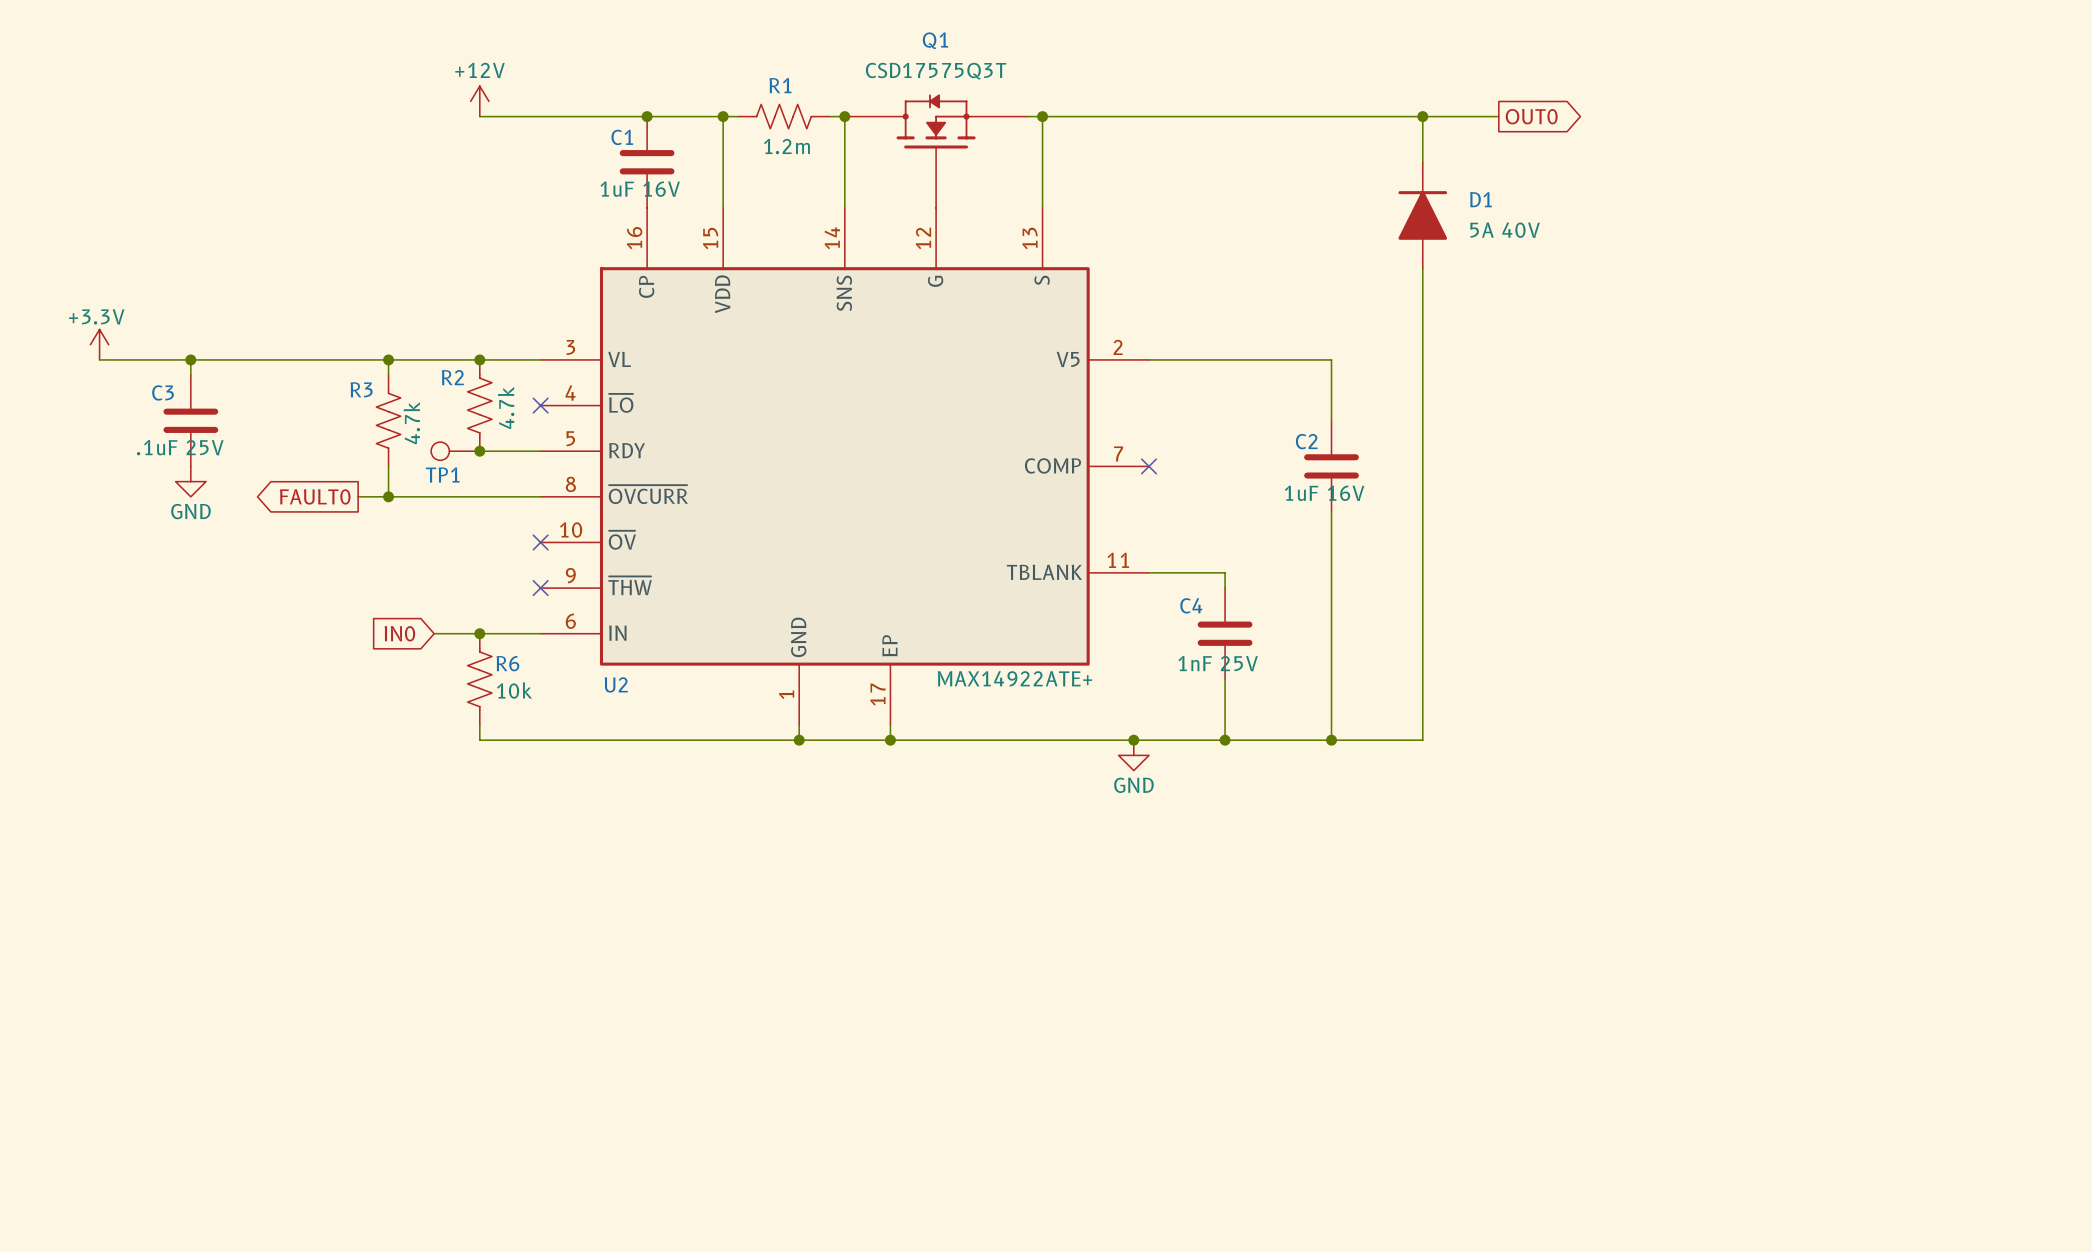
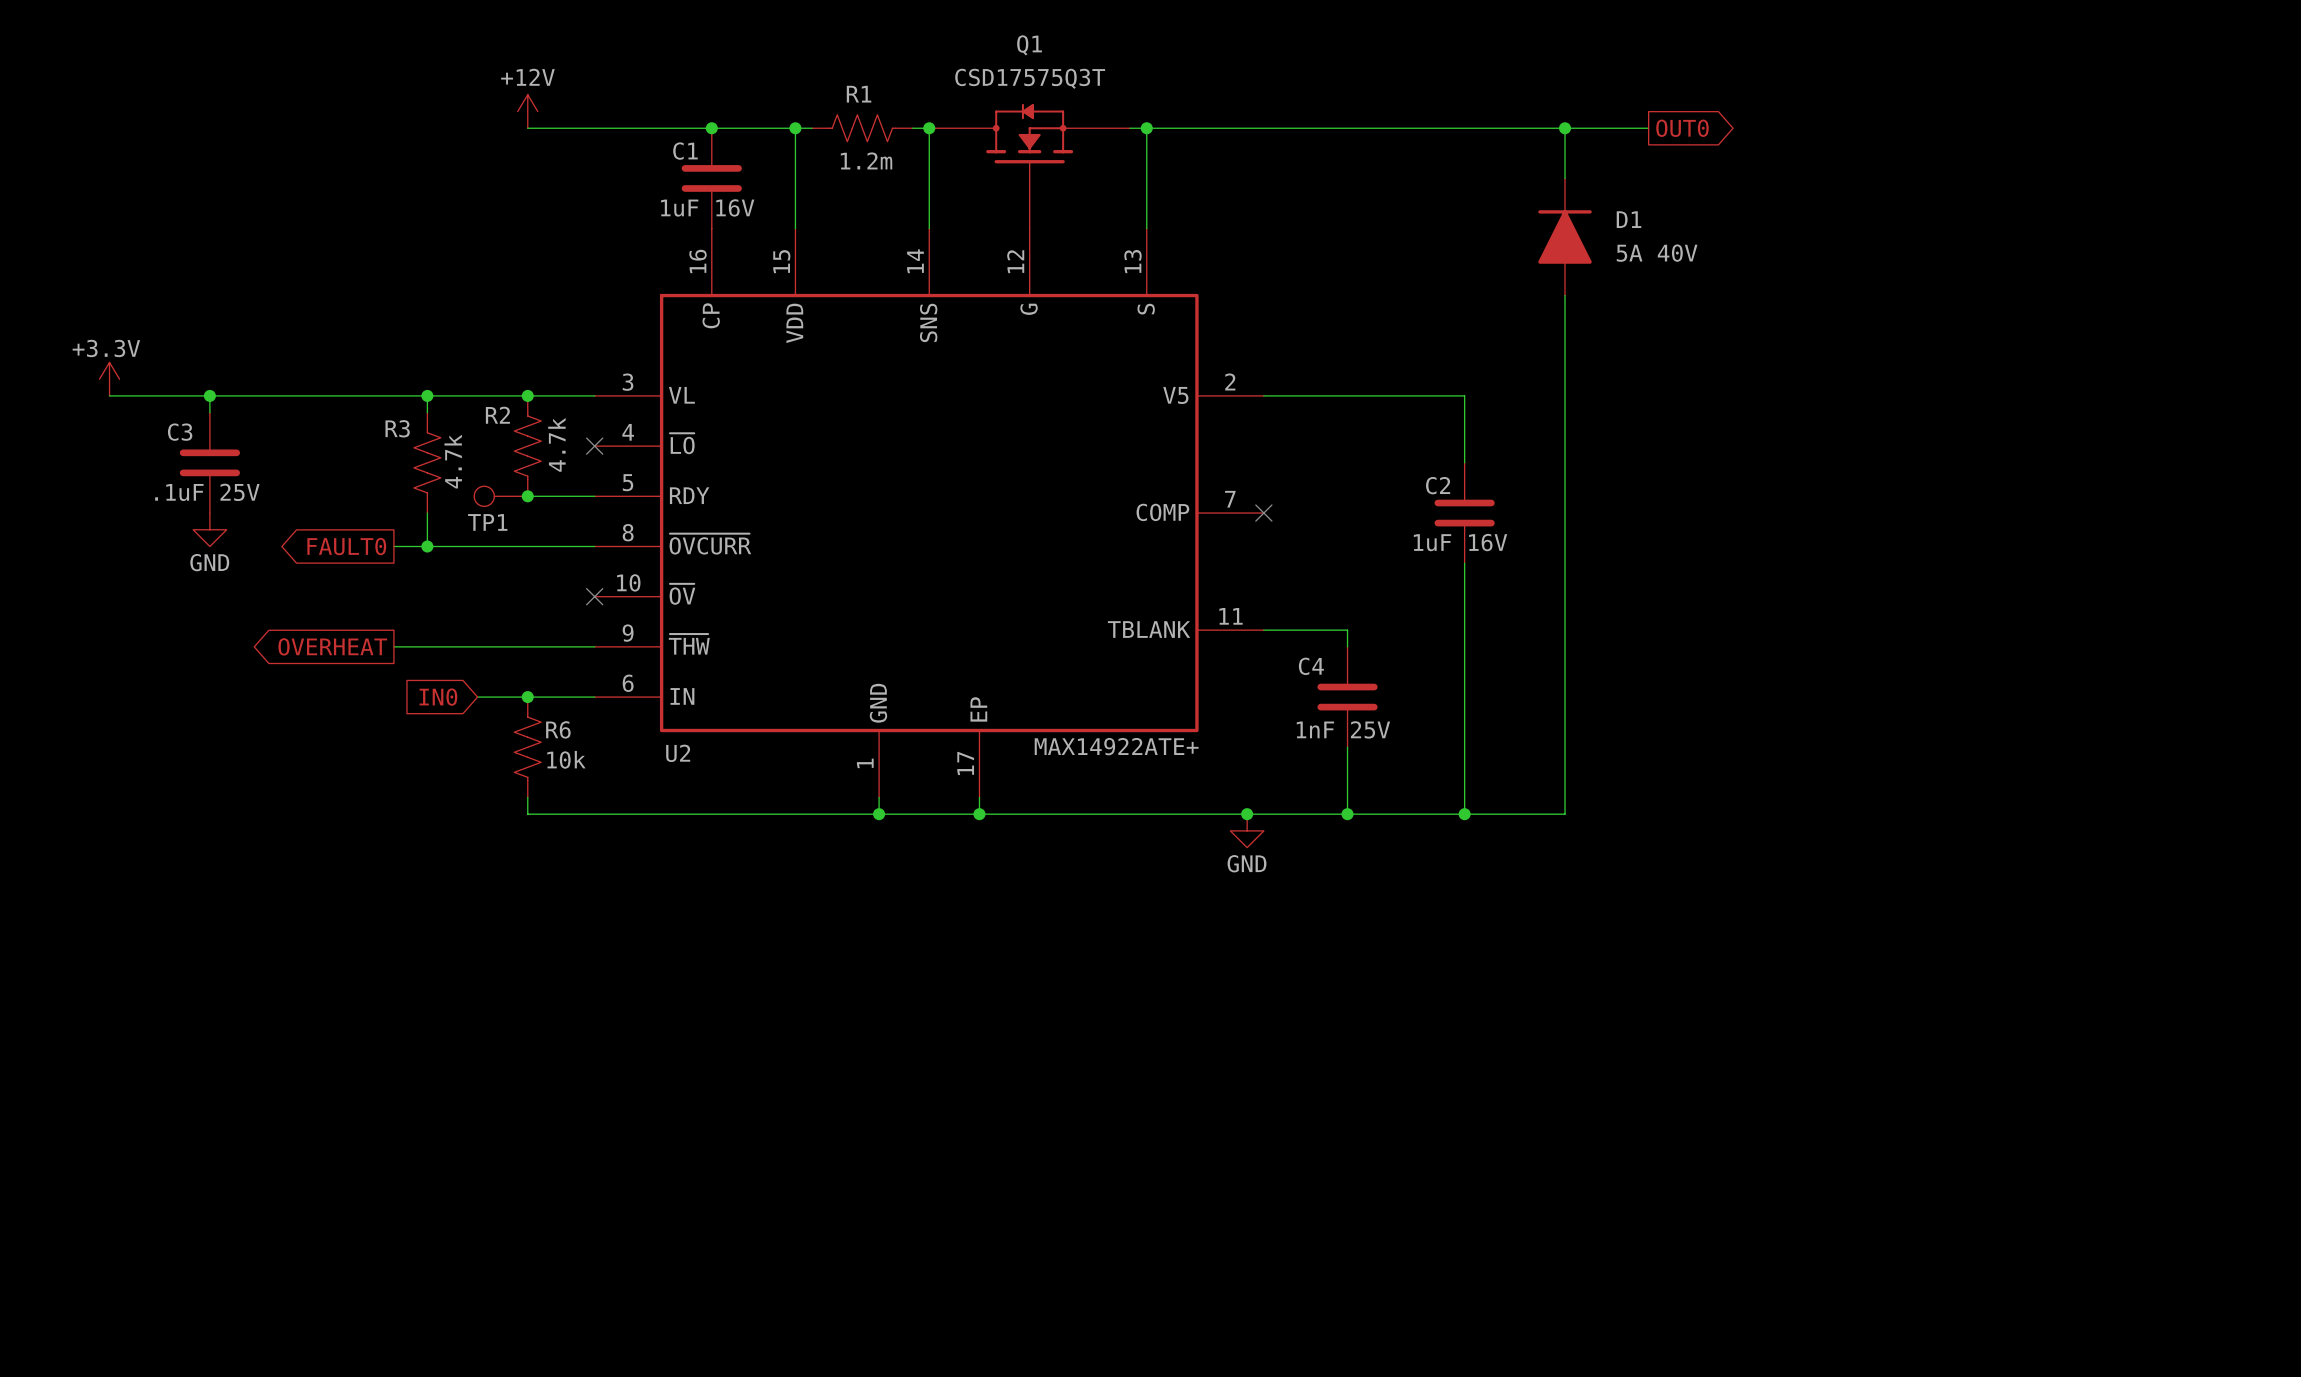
global label: none -> OVERHEAT (332, 646)
wire: none -> (393, 646) (594, 646)
no-connect mark: (540, 588) -> none

